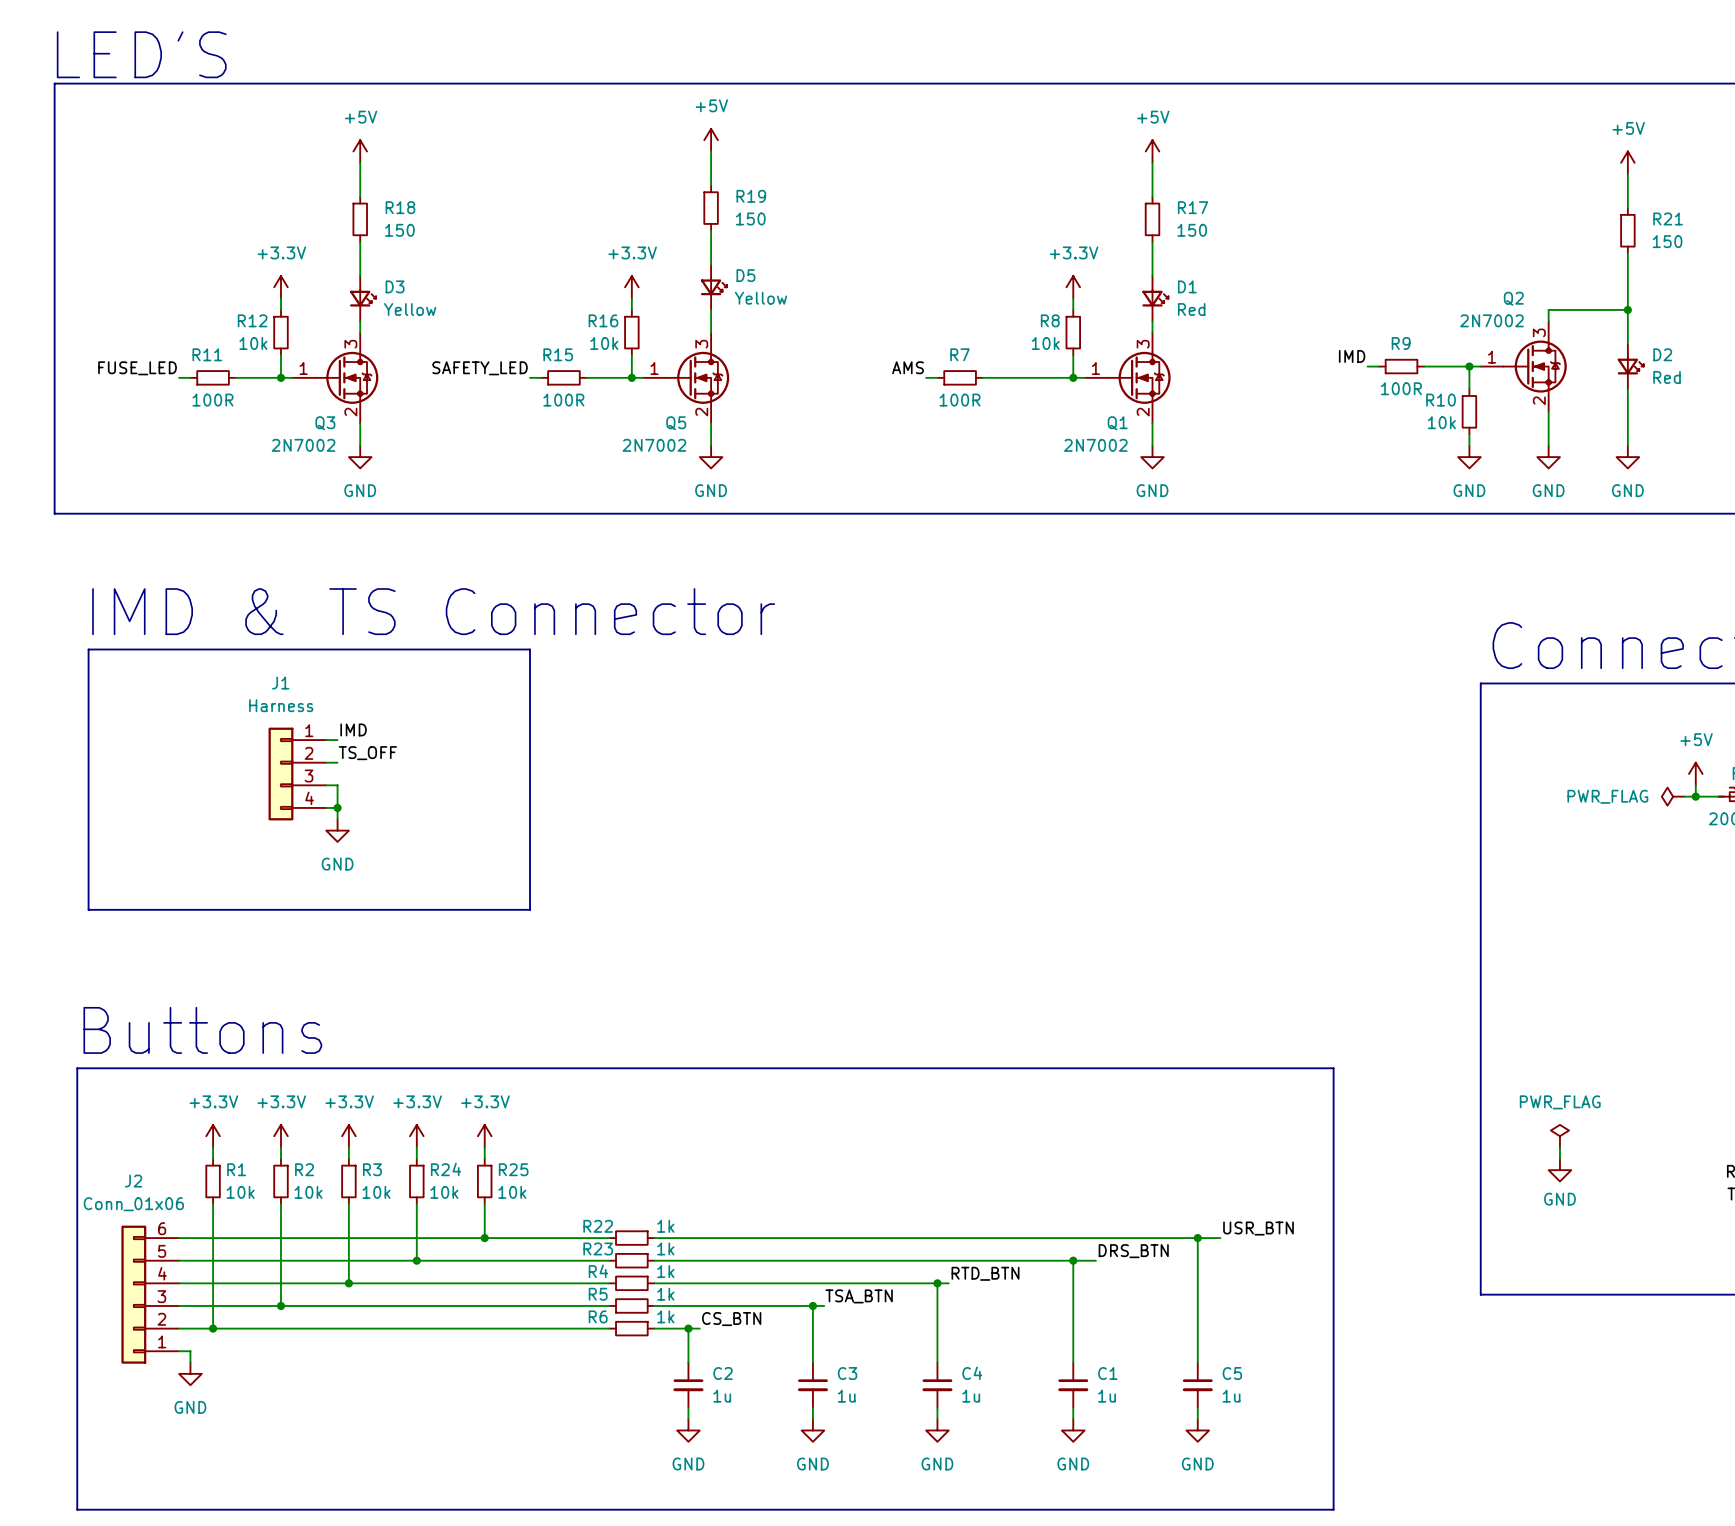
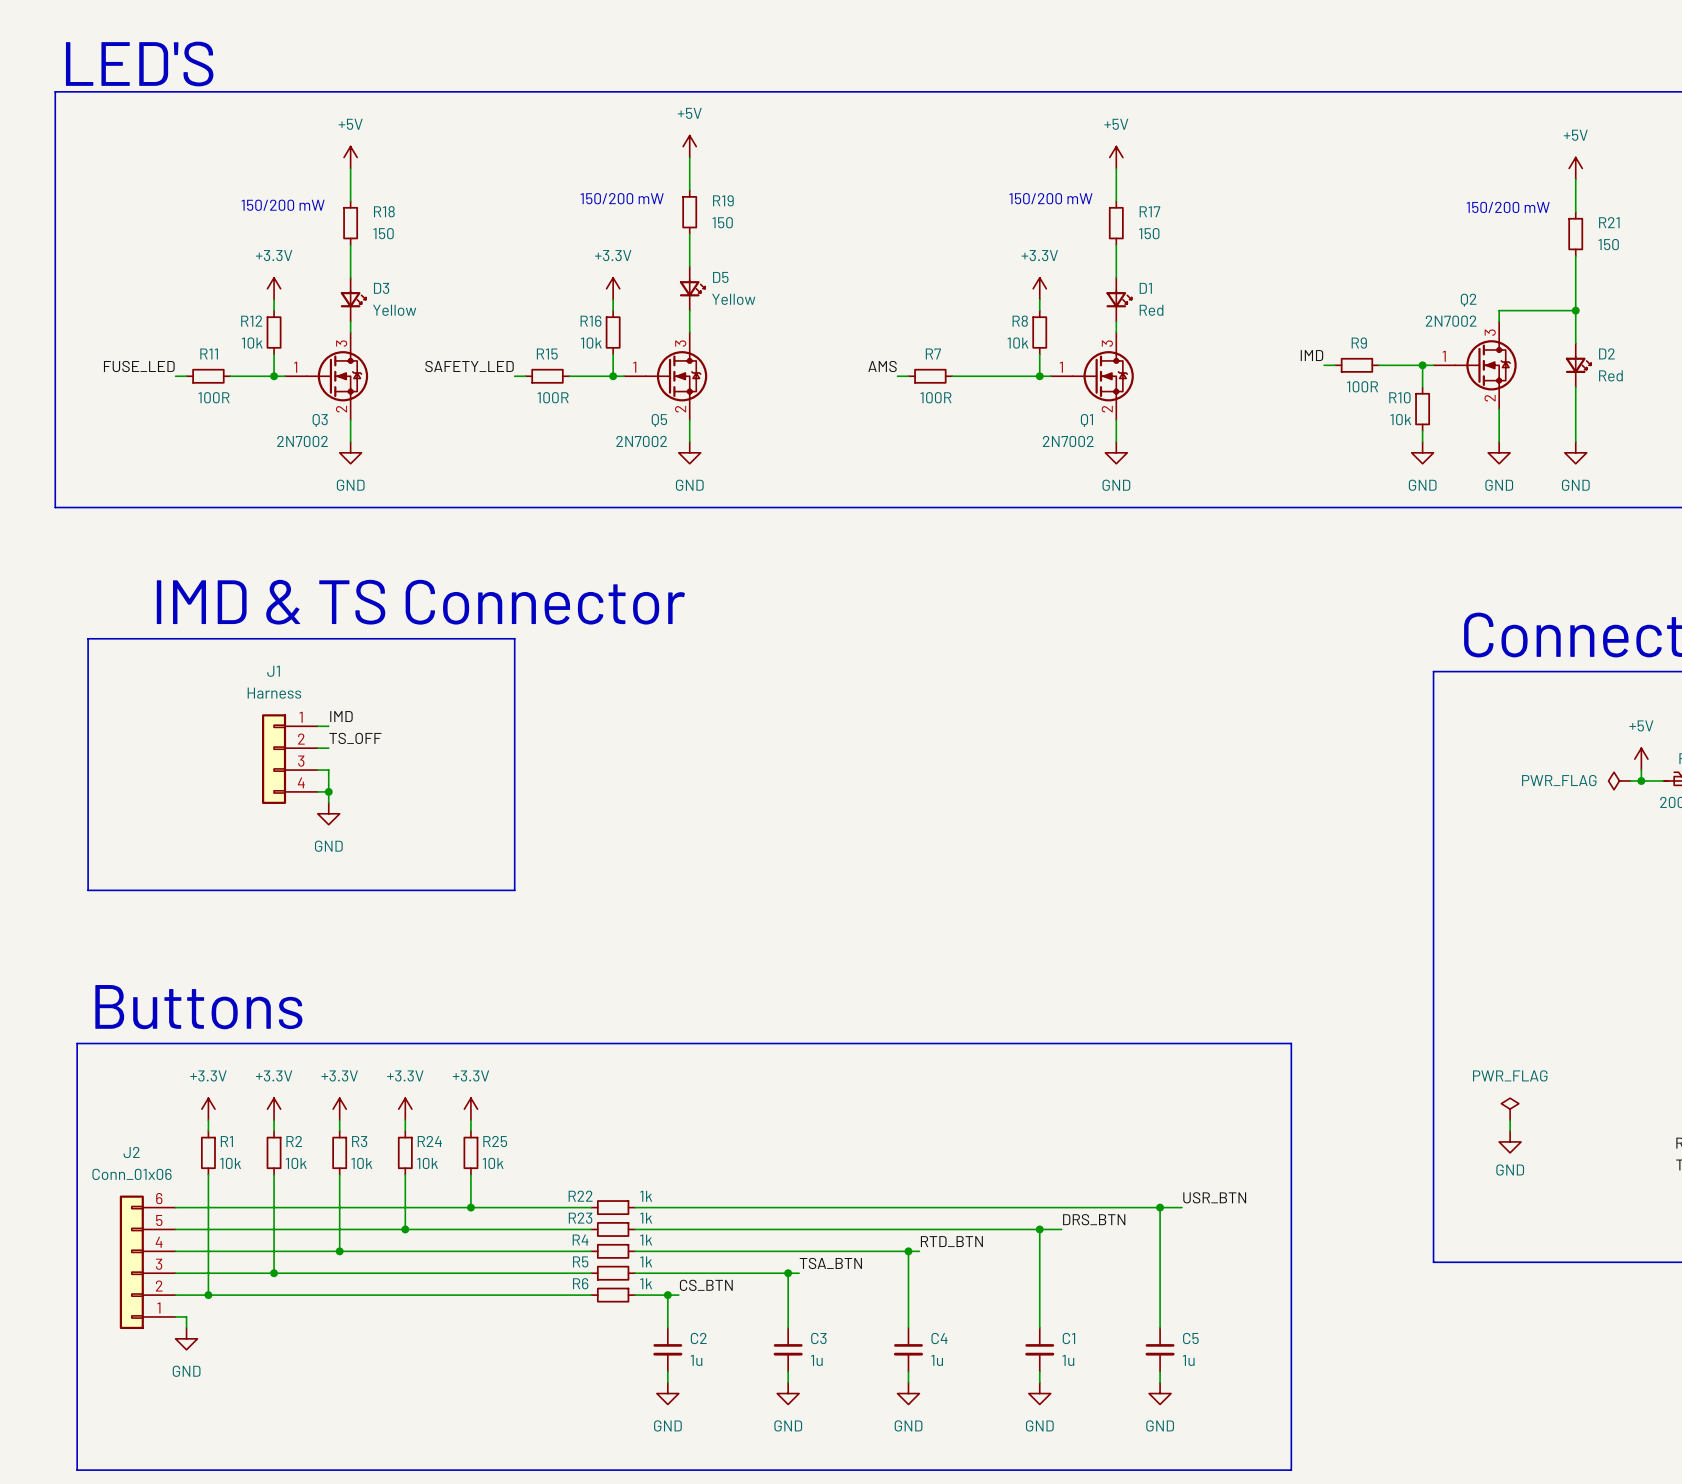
text: none -> 150/200 mW (622, 198)
text: none -> 150/200 mW (1050, 198)
text: none -> 150/200 mW (283, 205)
text: none -> 150/200 mW (1508, 207)

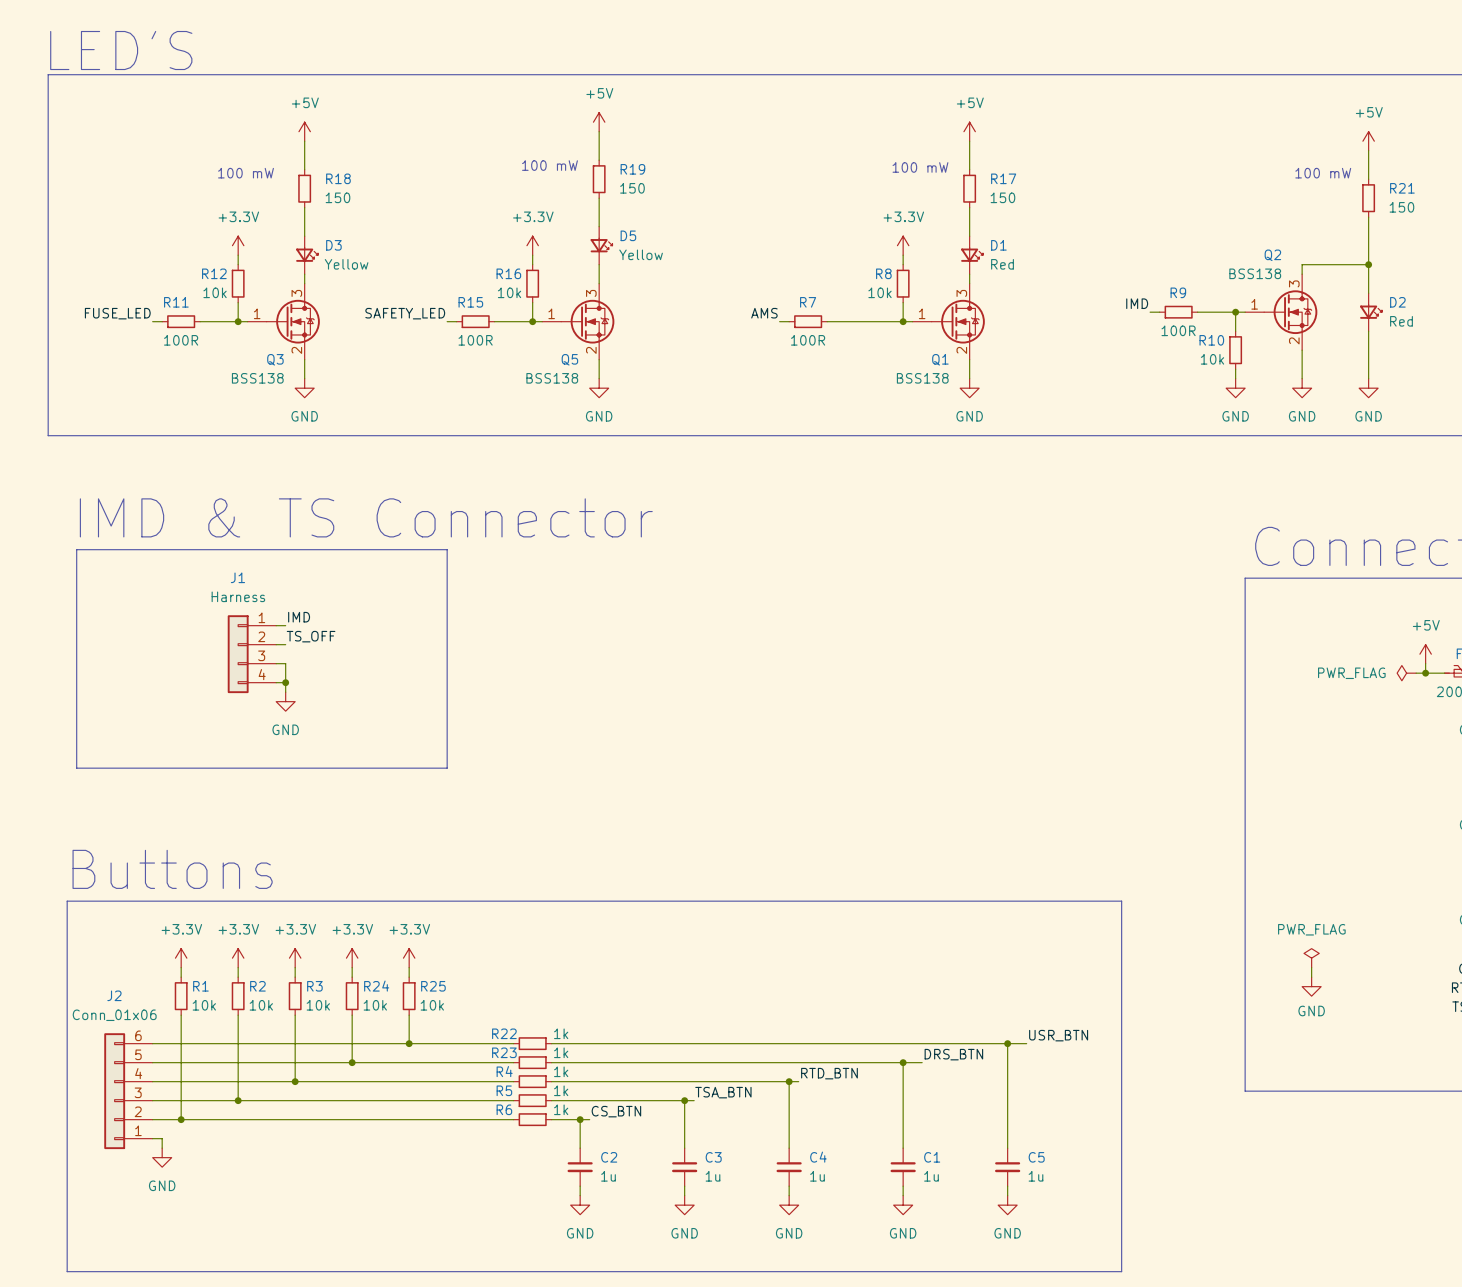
text: 150/200 mW (622, 198) -> 100 mW (549, 165)
text: 150/200 mW (1050, 198) -> 100 mW (920, 167)
text: 150/200 mW (283, 205) -> 100 mW (246, 173)
text: 150/200 mW (1508, 207) -> 100 mW (1323, 173)
Q2 value: 2N7002 (1451, 321) -> BSS138 (1255, 273)
Q3 value: 2N7002 (302, 441) -> BSS138 (257, 378)
Q5 value: 2N7002 (641, 441) -> BSS138 (552, 378)
Q1 value: 2N7002 (1068, 441) -> BSS138 (922, 378)

